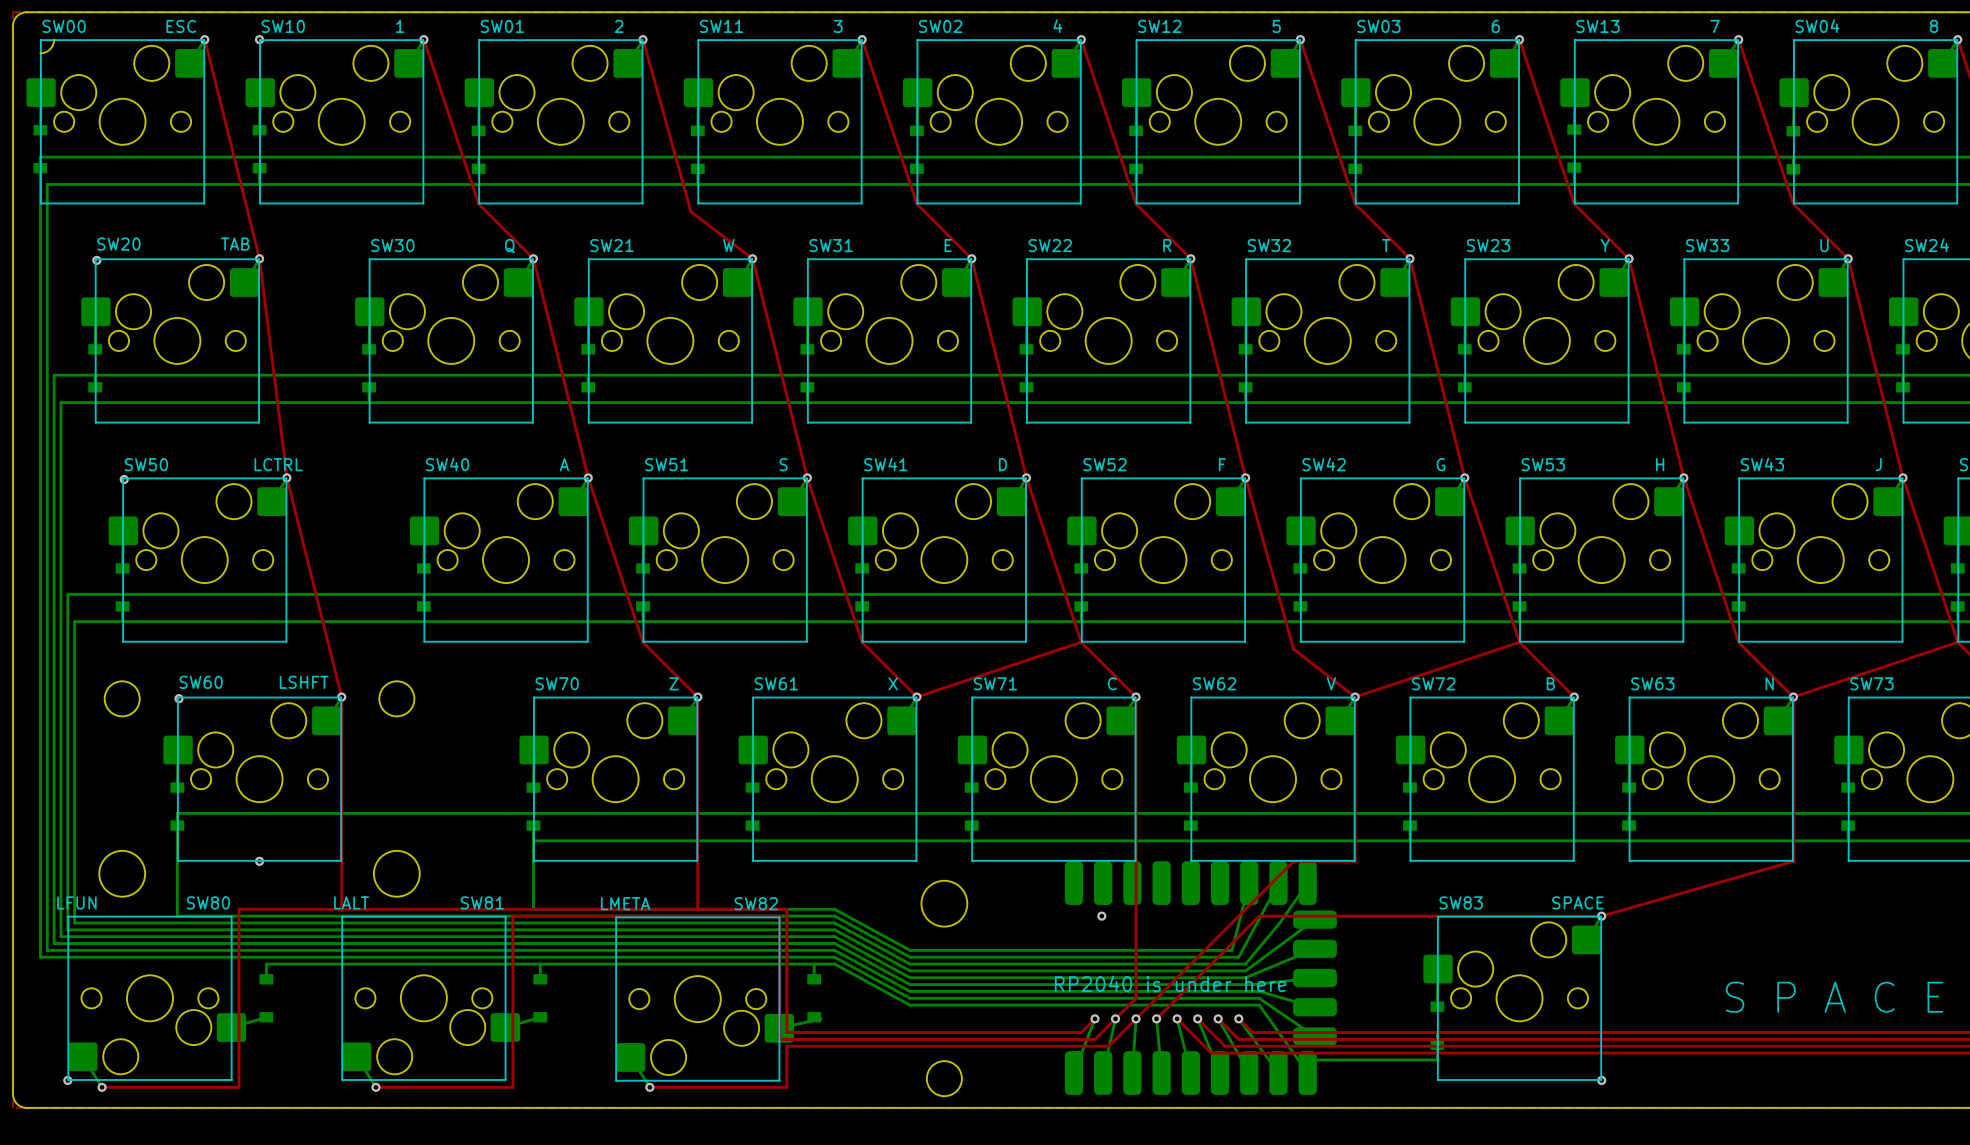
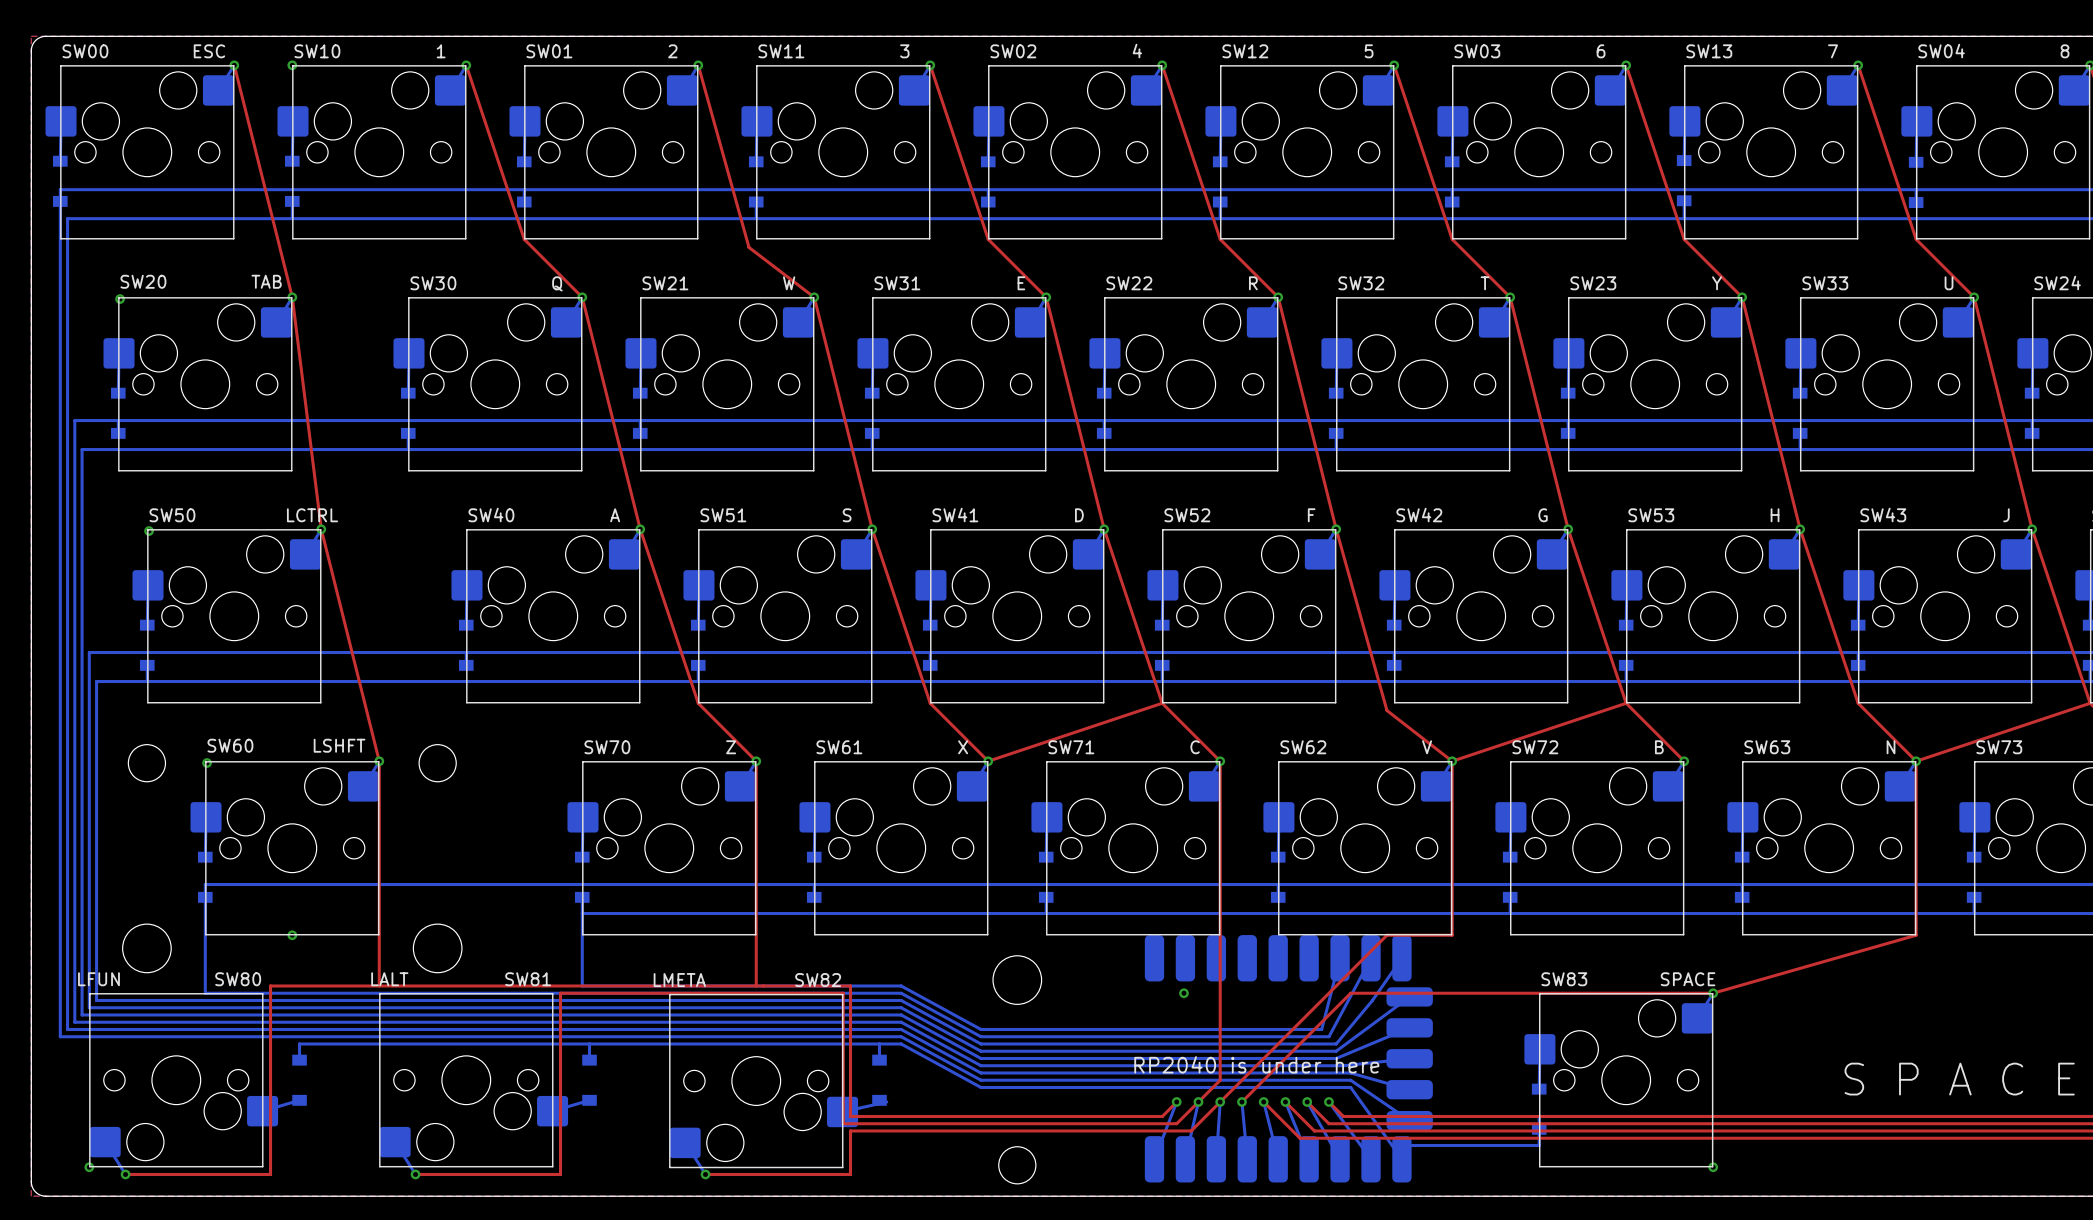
board edge: (54, 39) (50, 49) (40, 53) -> none

